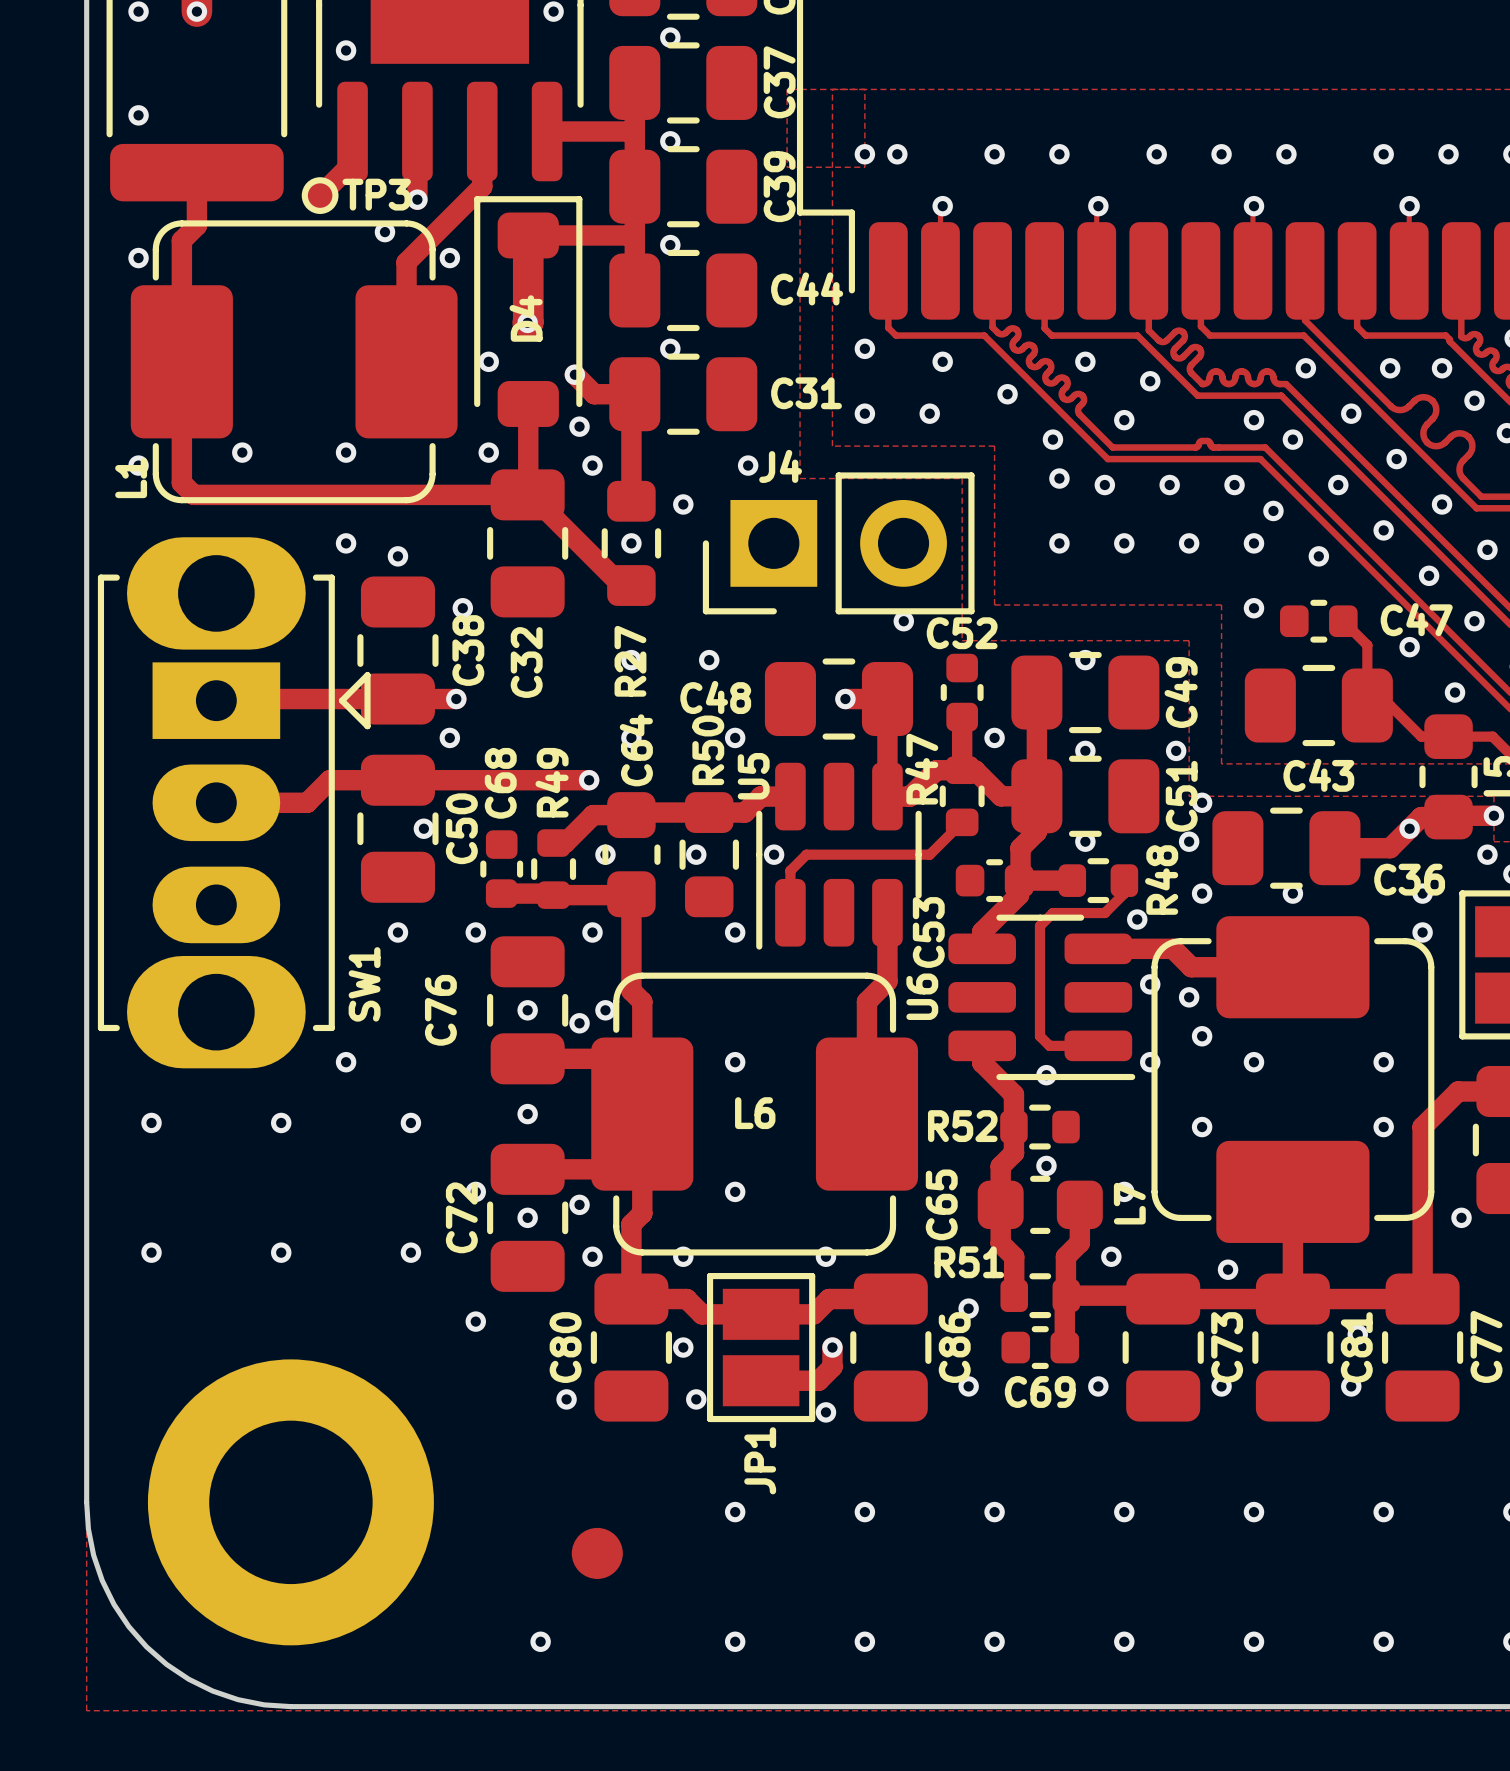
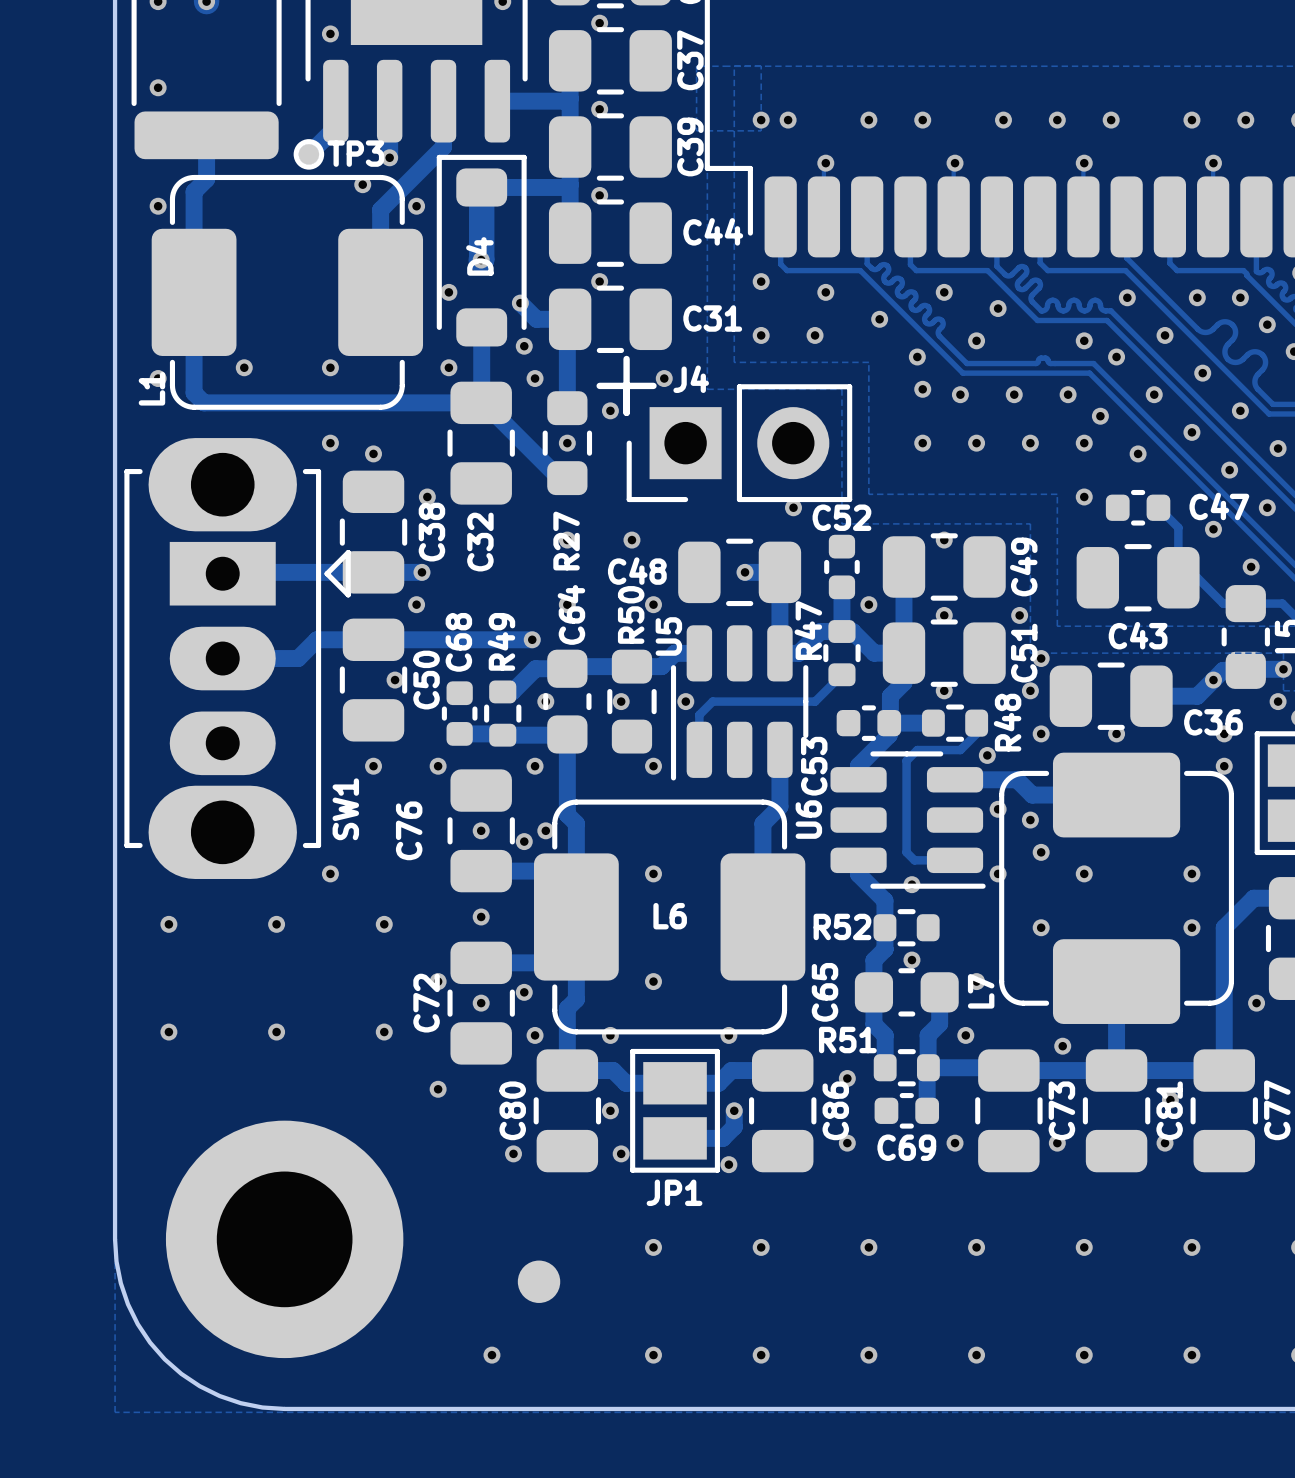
line: none -> (626, 358) (626, 412)
line: none -> (599, 385) (653, 385)
JP1 name rotation: 0° (760, 1460) -> 90° clockwise (674, 1192)

